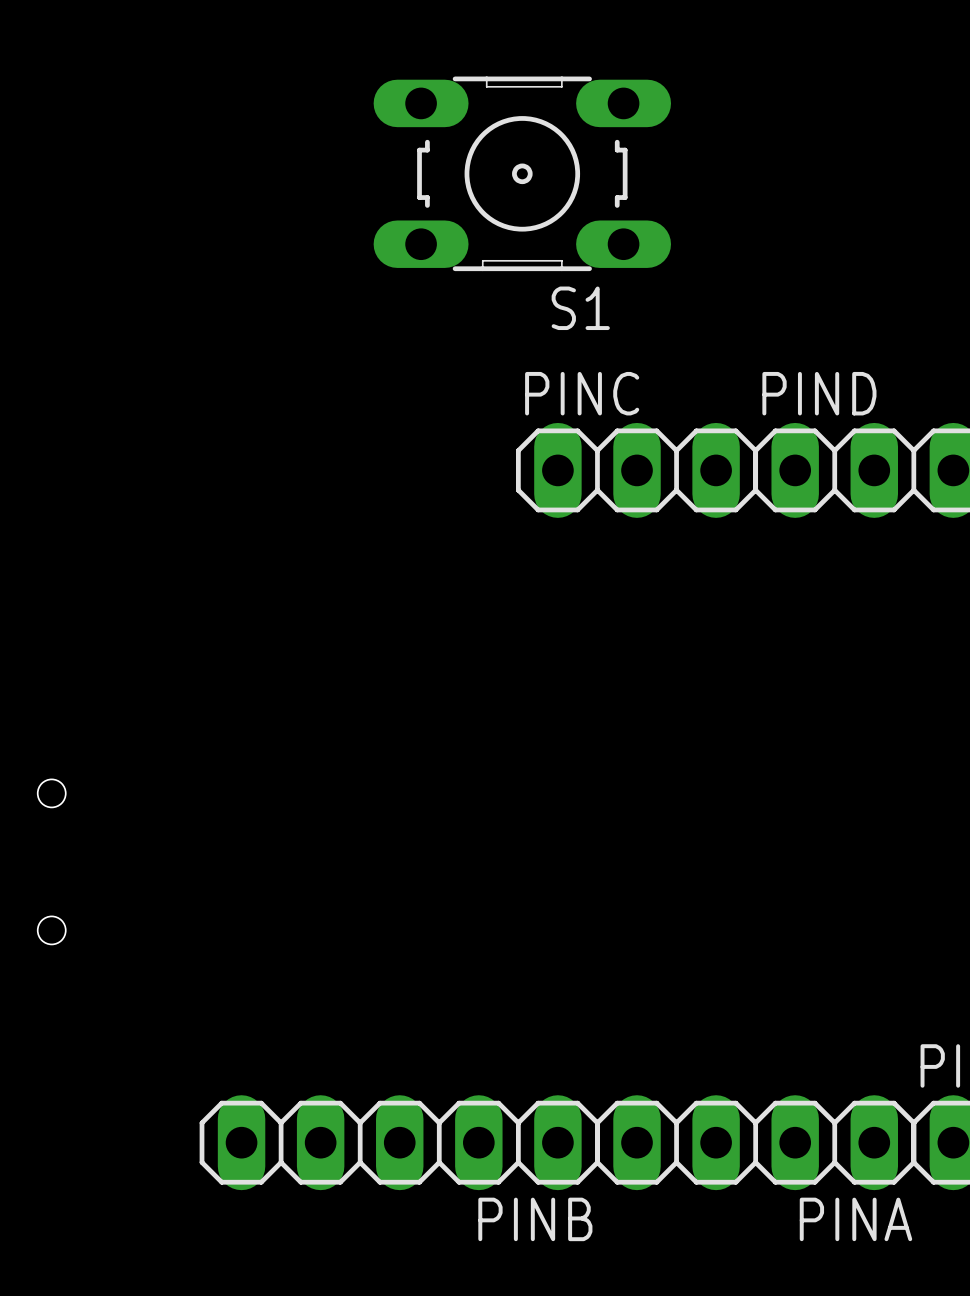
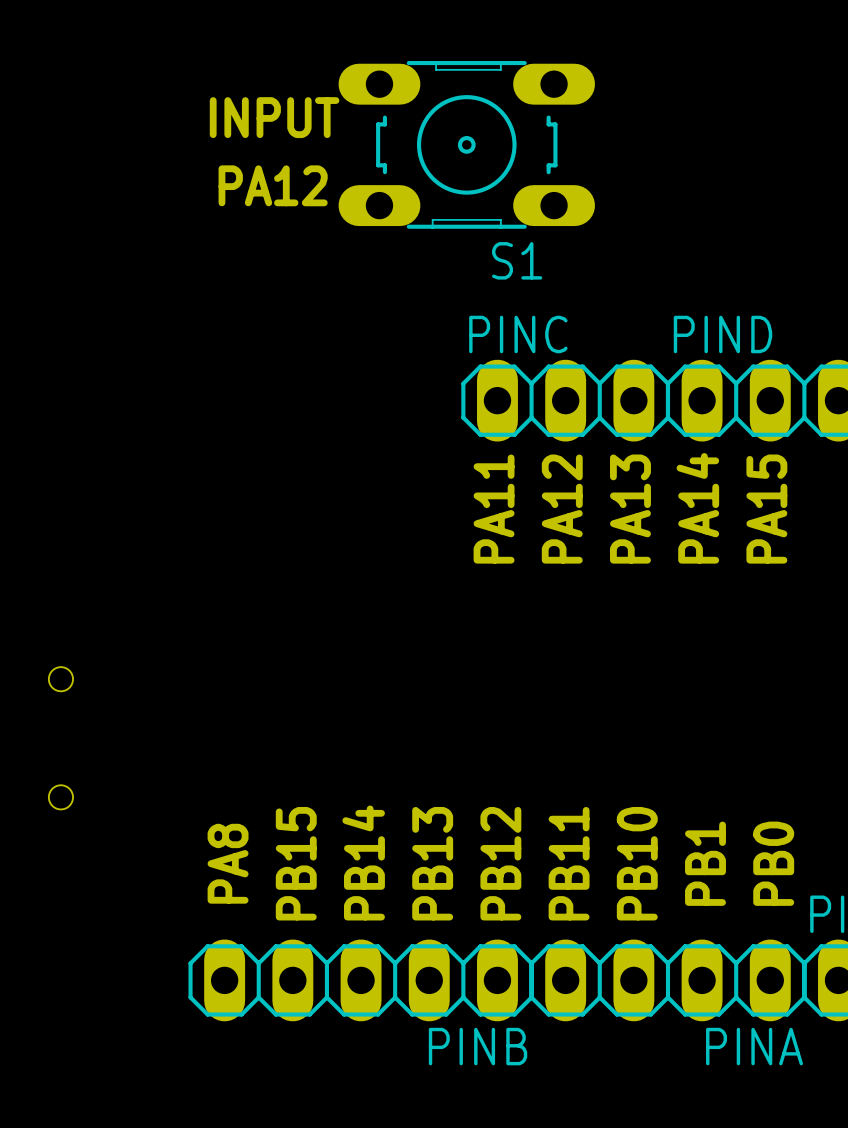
text: none -> INPUT (274, 117)
text: none -> PA12 (273, 185)
text: none -> PA14 (697, 508)
text: none -> PA11 (494, 509)
text: none -> PA12 (562, 509)
text: none -> PA13 (630, 509)
text: none -> PA15 (766, 509)
text: none -> PB14 (363, 863)
text: none -> PA8 (228, 863)
text: none -> PB15 (296, 863)
text: none -> PB13 (432, 863)
text: none -> PB12 (500, 863)
text: none -> PB11 (569, 863)
text: none -> PB10 (637, 863)
text: none -> PB1 (705, 863)
text: none -> PB0 (773, 863)

